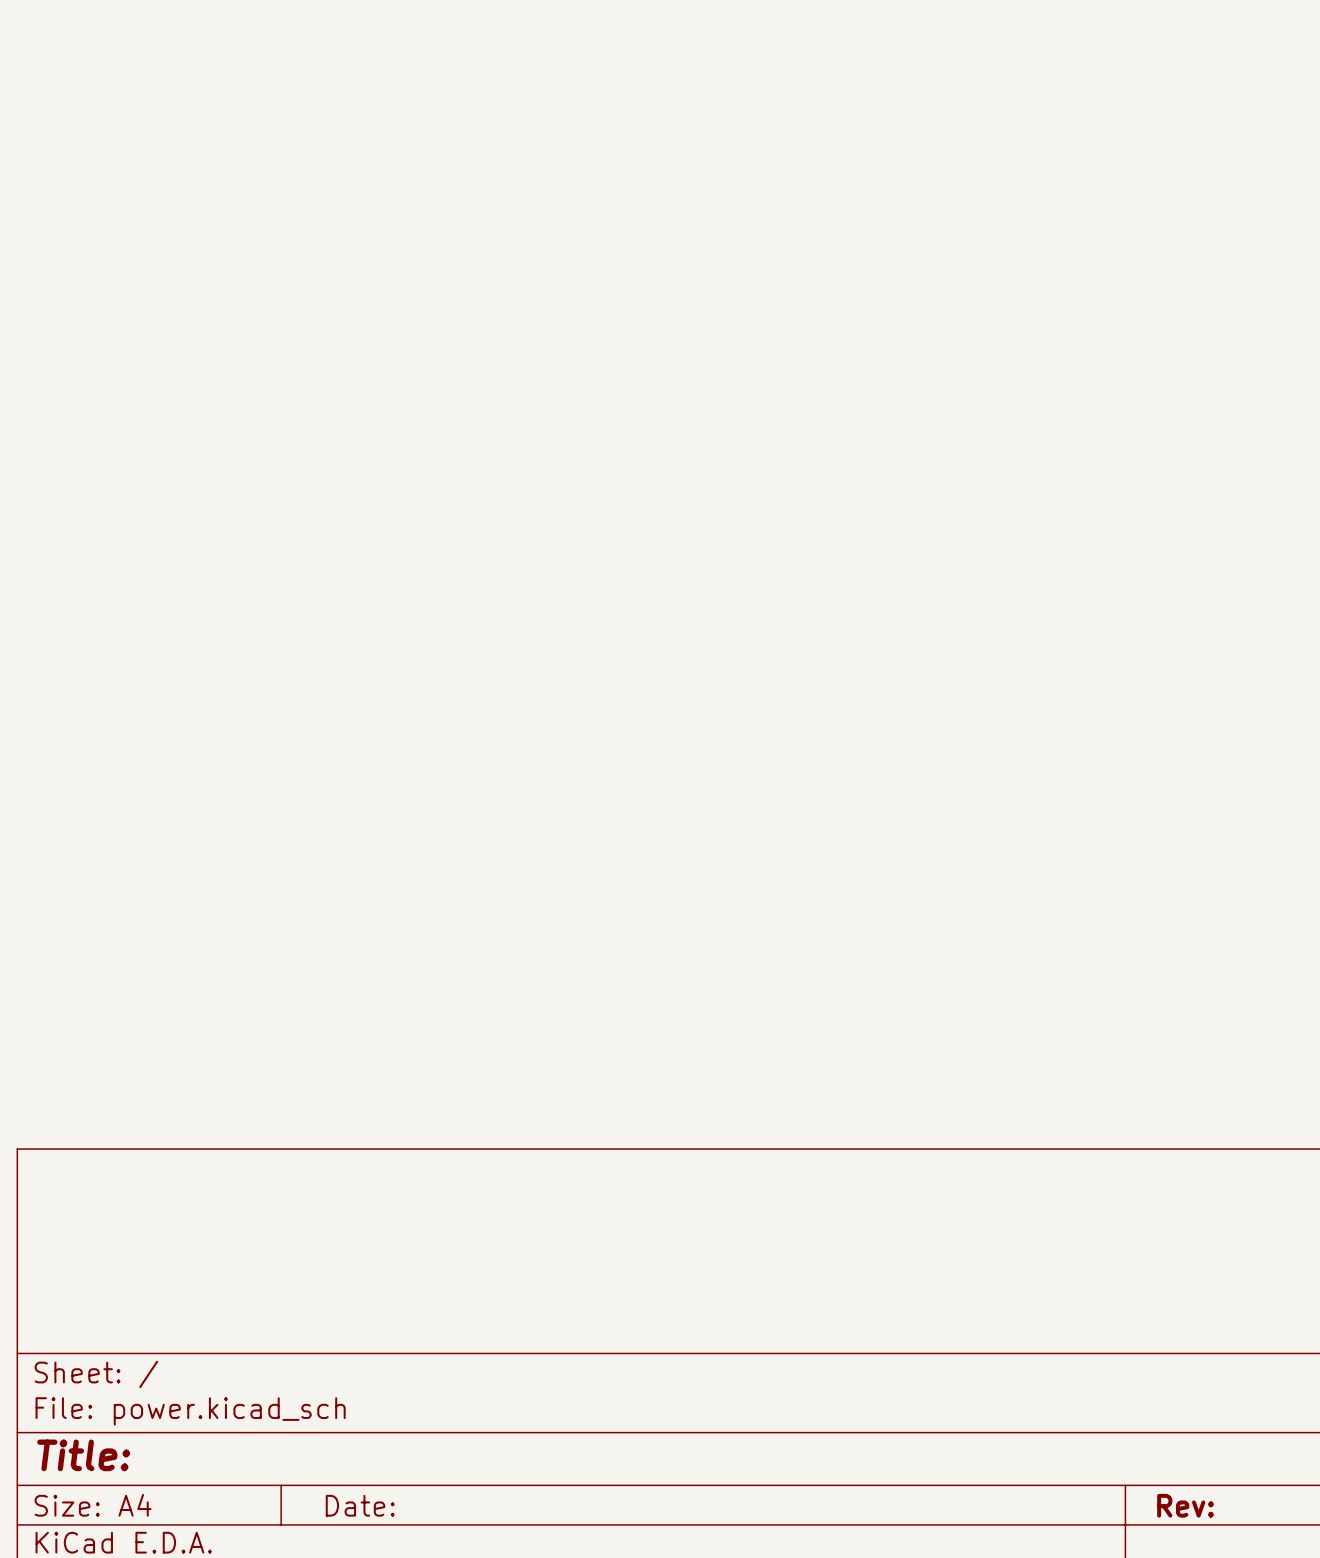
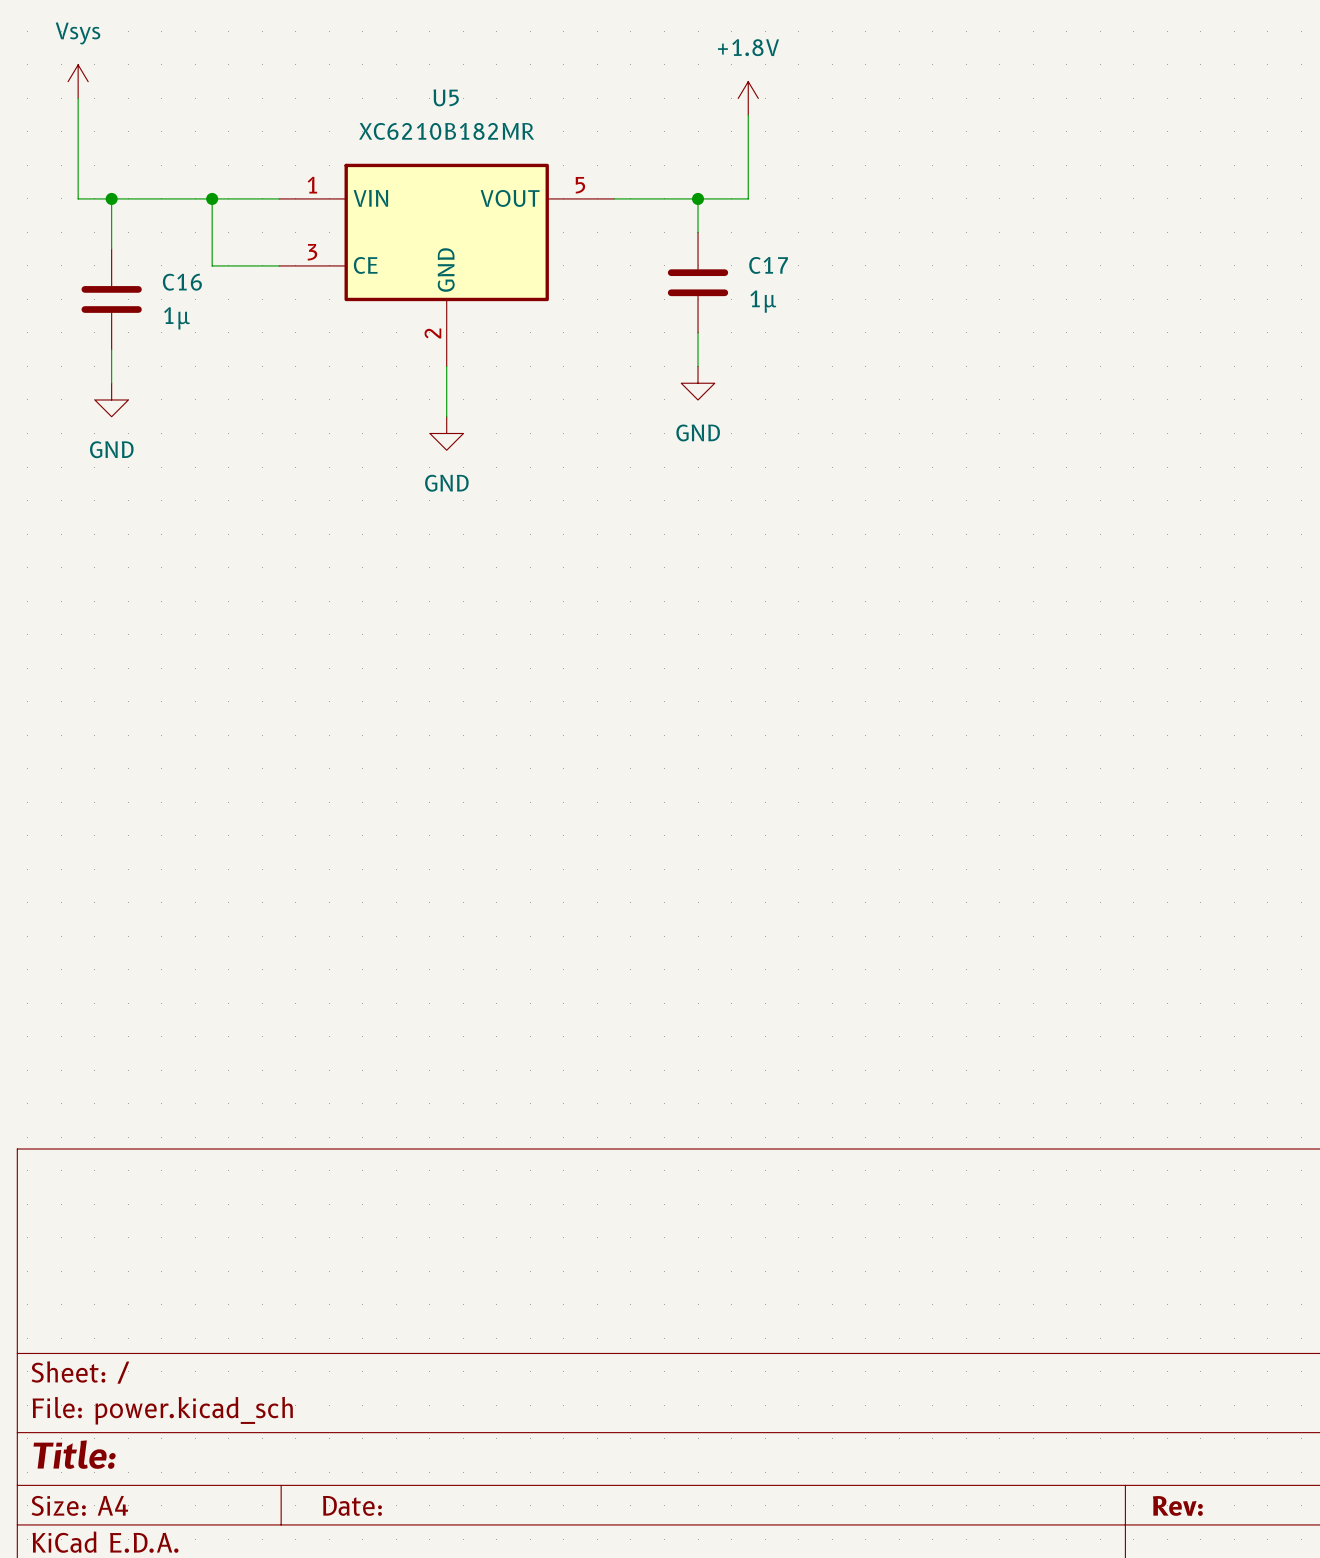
power symbol: none -> Vsys (78, 81)
wire: none -> (78, 98) (78, 198) (279, 198)
power symbol: none -> +1.8V (748, 98)
wire: none -> (748, 115) (748, 198) (614, 198)
wire: none -> (111, 198) (111, 249)
junction: none -> (111, 198)
wire: none -> (212, 198) (212, 265) (279, 265)
junction: none -> (212, 198)
wire: none -> (698, 198) (698, 232)
junction: none -> (698, 198)
U5: none -> XC6210B182MR (446, 265)
C17: none -> 1µ (698, 282)
C16: none -> 1µ (111, 299)
wire: none -> (698, 332) (698, 366)
wire: none -> (111, 349) (111, 383)
wire: none -> (446, 366) (446, 416)
power symbol: none -> GND (698, 383)
power symbol: none -> GND (111, 399)
power symbol: none -> GND (446, 433)

